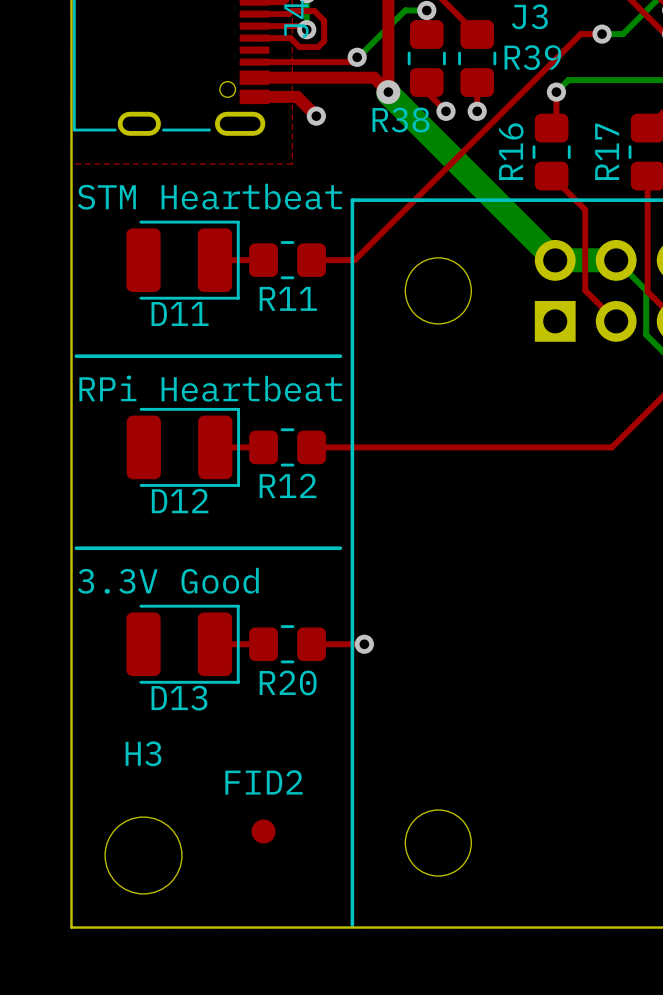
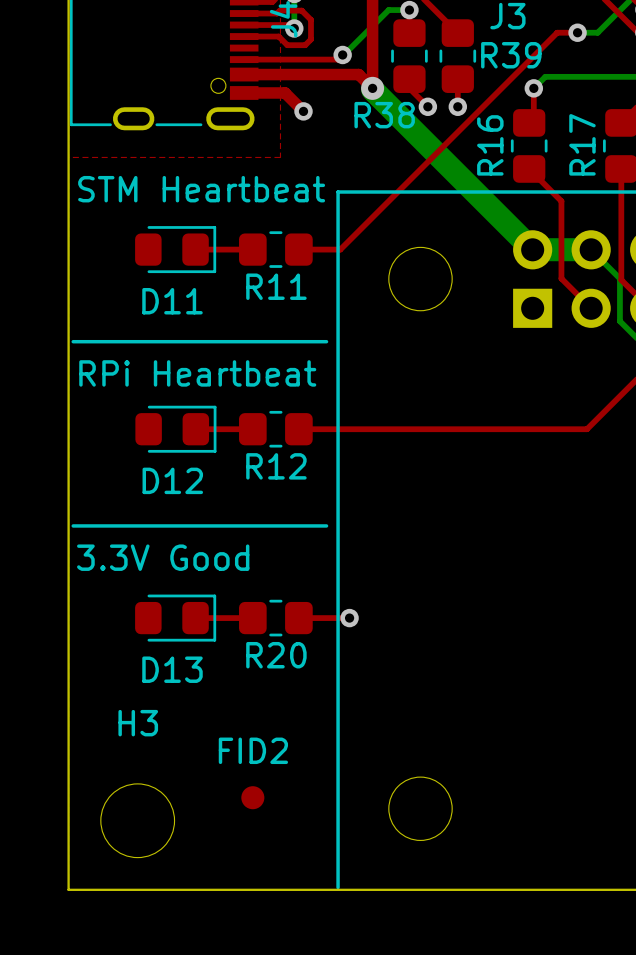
D11 footprint: [126, 220, 240, 300] -> [135, 226, 217, 274]
D12 footprint: [126, 407, 241, 487] -> [135, 405, 217, 453]
D13 footprint: [126, 604, 240, 684] -> [135, 594, 217, 642]

